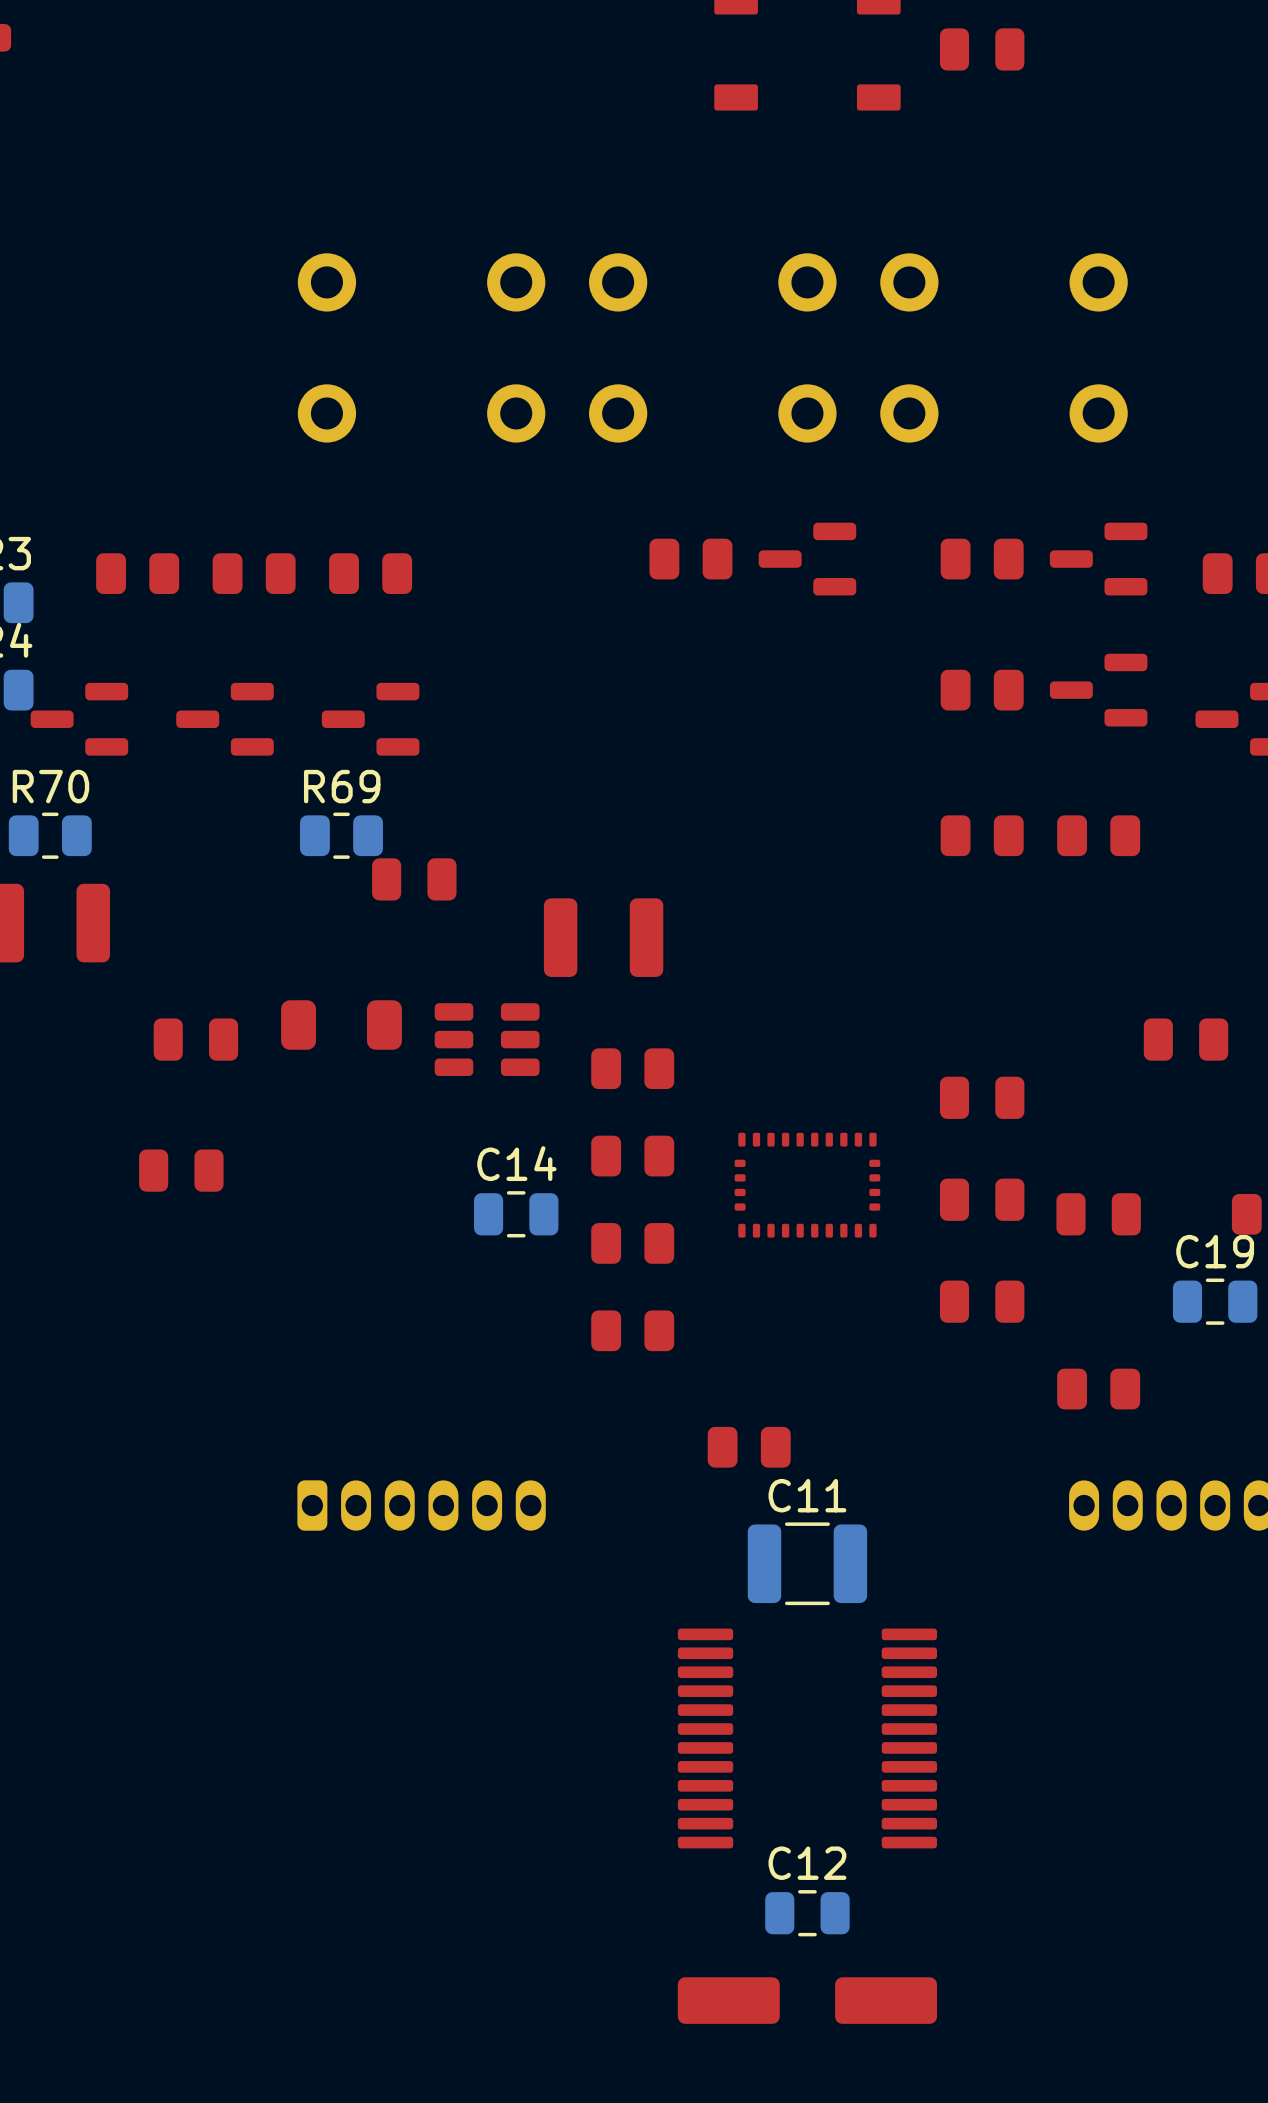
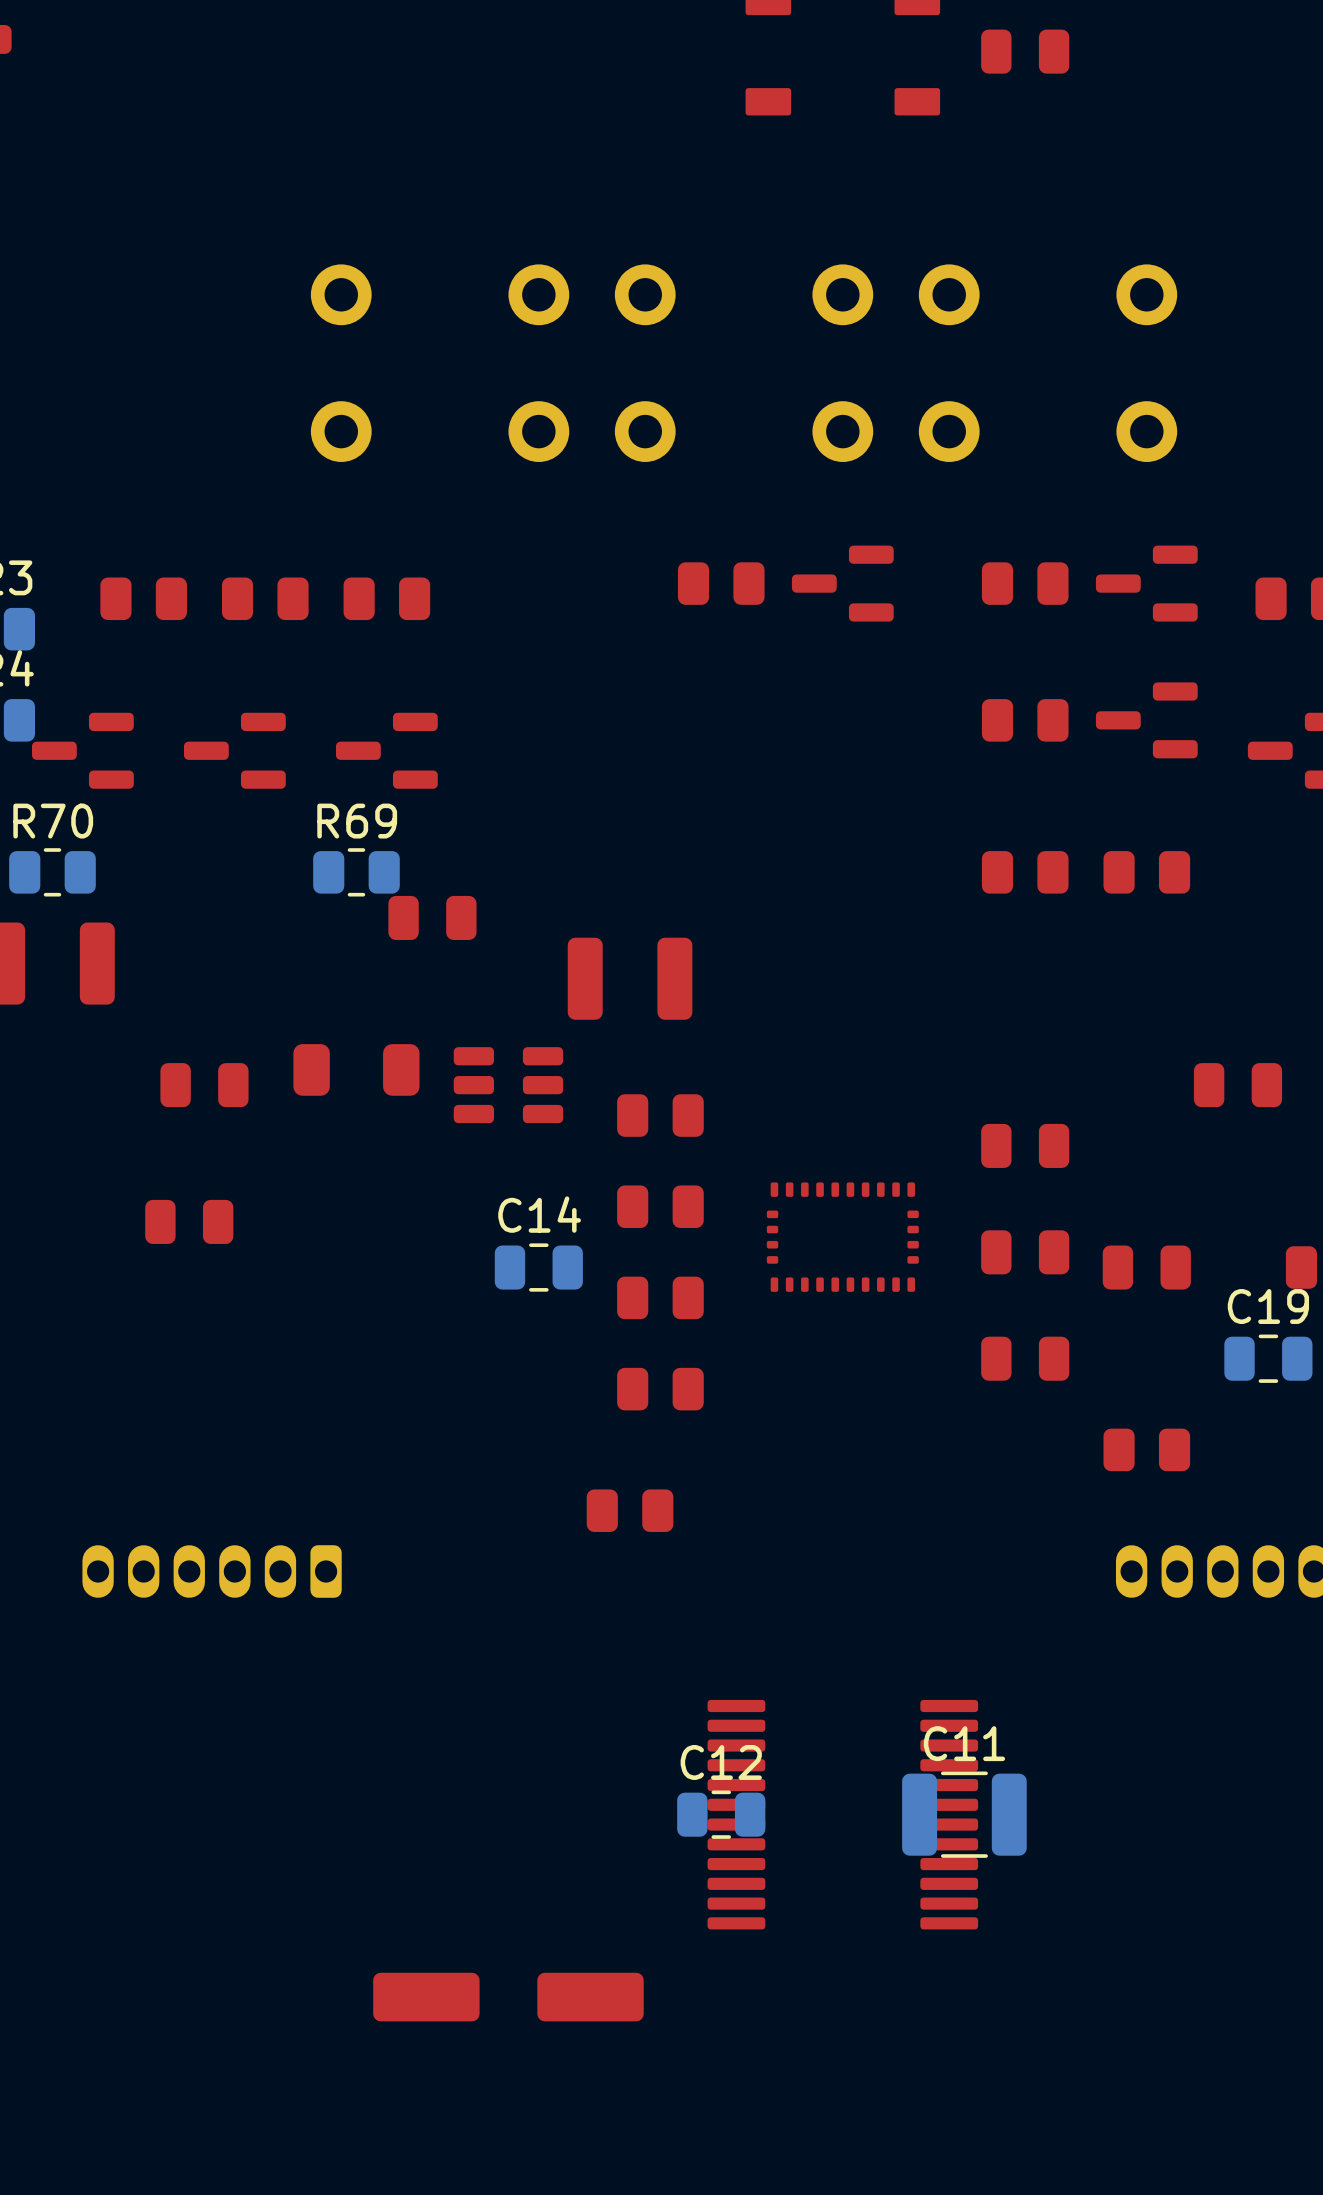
part position: (749, 1447) -> (630, 1510)
part rotation: 0° (421, 1505) -> 180° (212, 1571)
part position: (421, 1505) -> (212, 1571)
C11 position: (807, 1563) -> (964, 1814)
C12 position: (807, 1913) -> (721, 1814)
part position: (807, 2000) -> (508, 1997)

